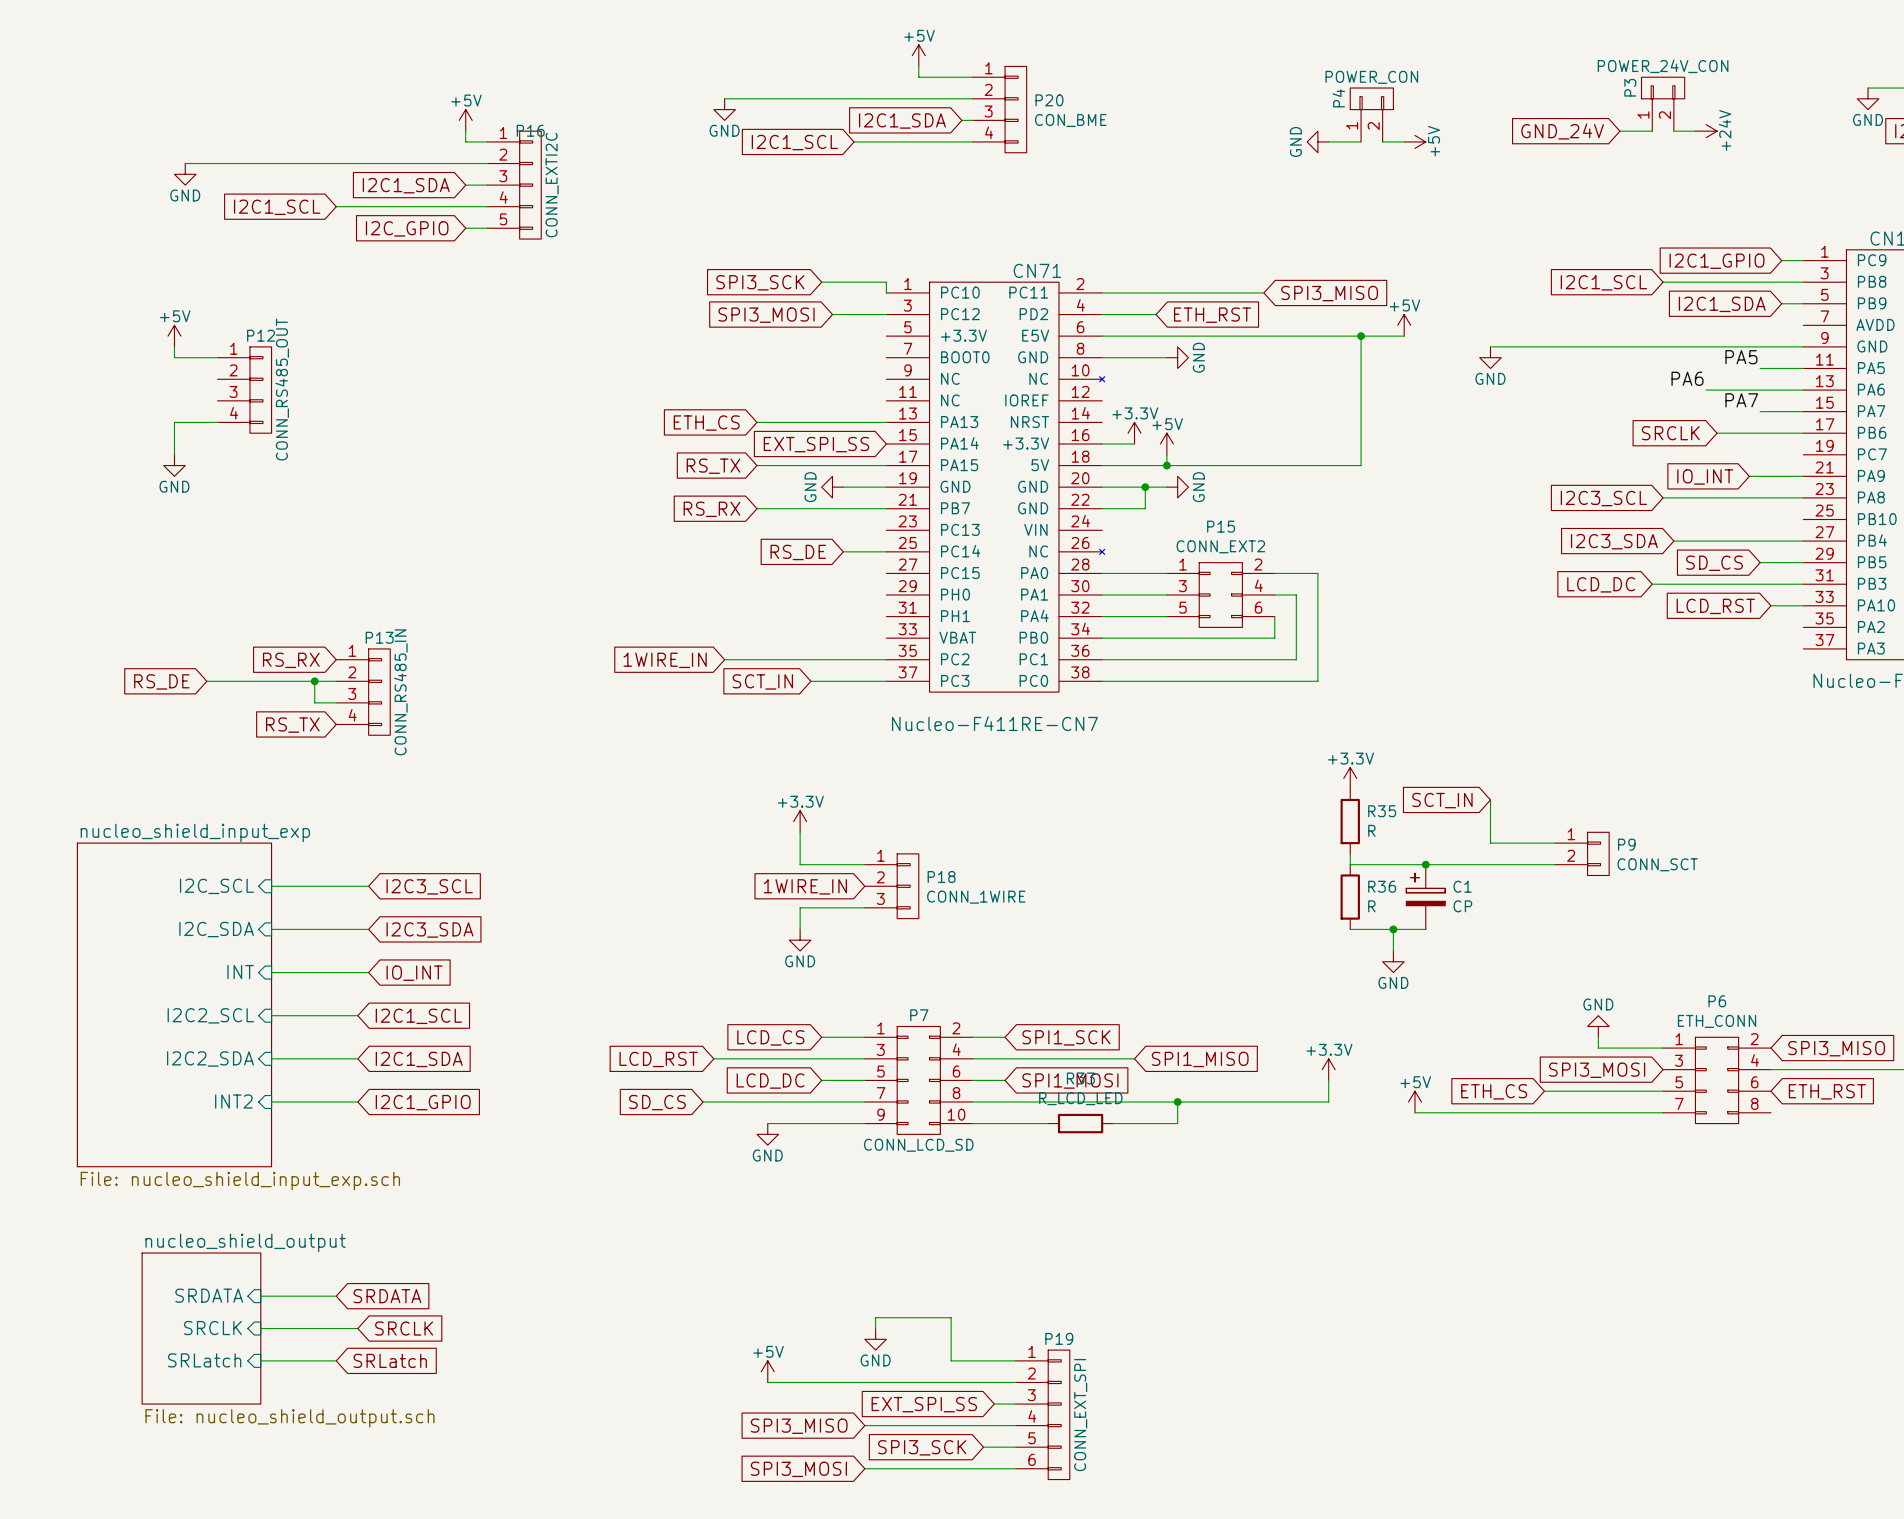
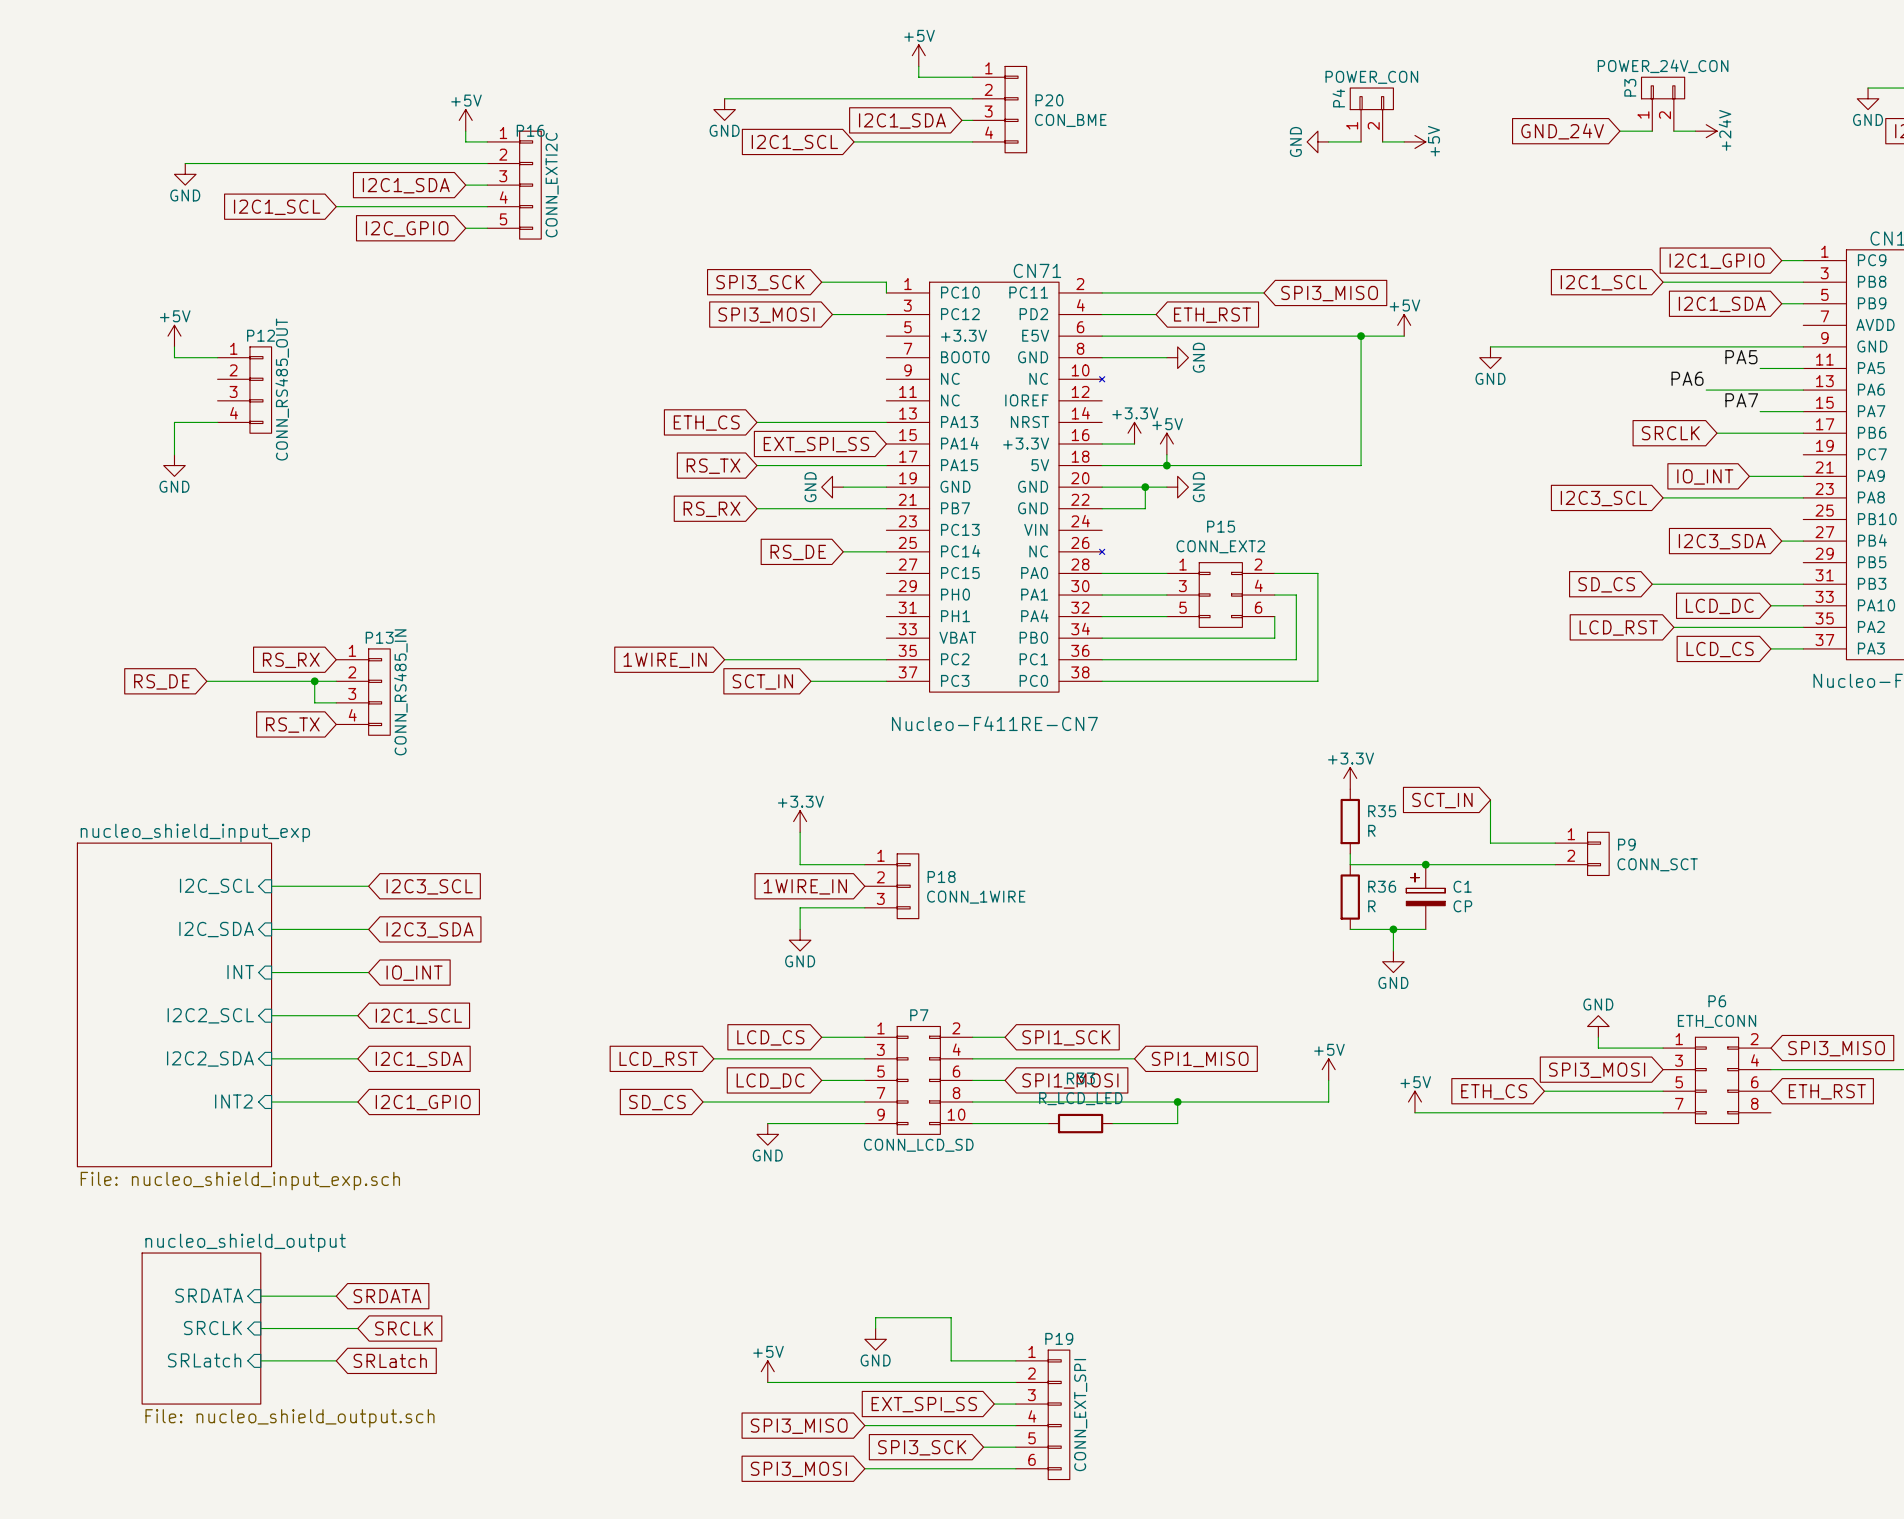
global label position: I2C3_SDA (1614, 541) -> I2C3_SDA (1722, 541)
wire: (1673, 541) (1781, 541) -> none
wire: (1760, 562) (1803, 562) -> none
global label: SD_CS (1714, 563) -> none
global label: LCD_DC (1601, 584) -> SD_CS (1606, 584)
global label: LCD_RST (1715, 606) -> LCD_DC (1719, 606)
global label: none -> LCD_RST (1618, 627)
wire: none -> (1673, 627) (1803, 627)
wire: none -> (1770, 648) (1803, 648)
global label: none -> LCD_CS (1720, 649)
power symbol: +3.3V (1328, 1069) -> +5V (1328, 1069)

